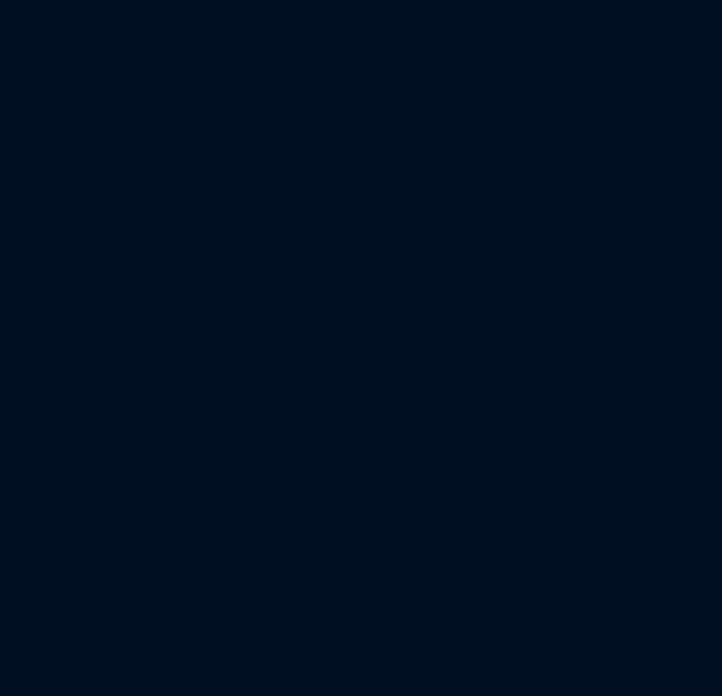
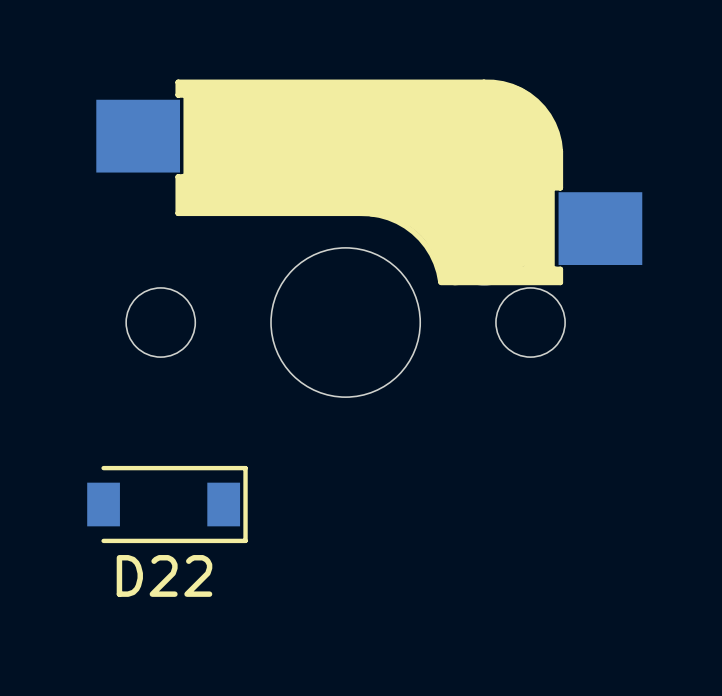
part: none -> (369, 238)
D22: none -> (167, 504)

